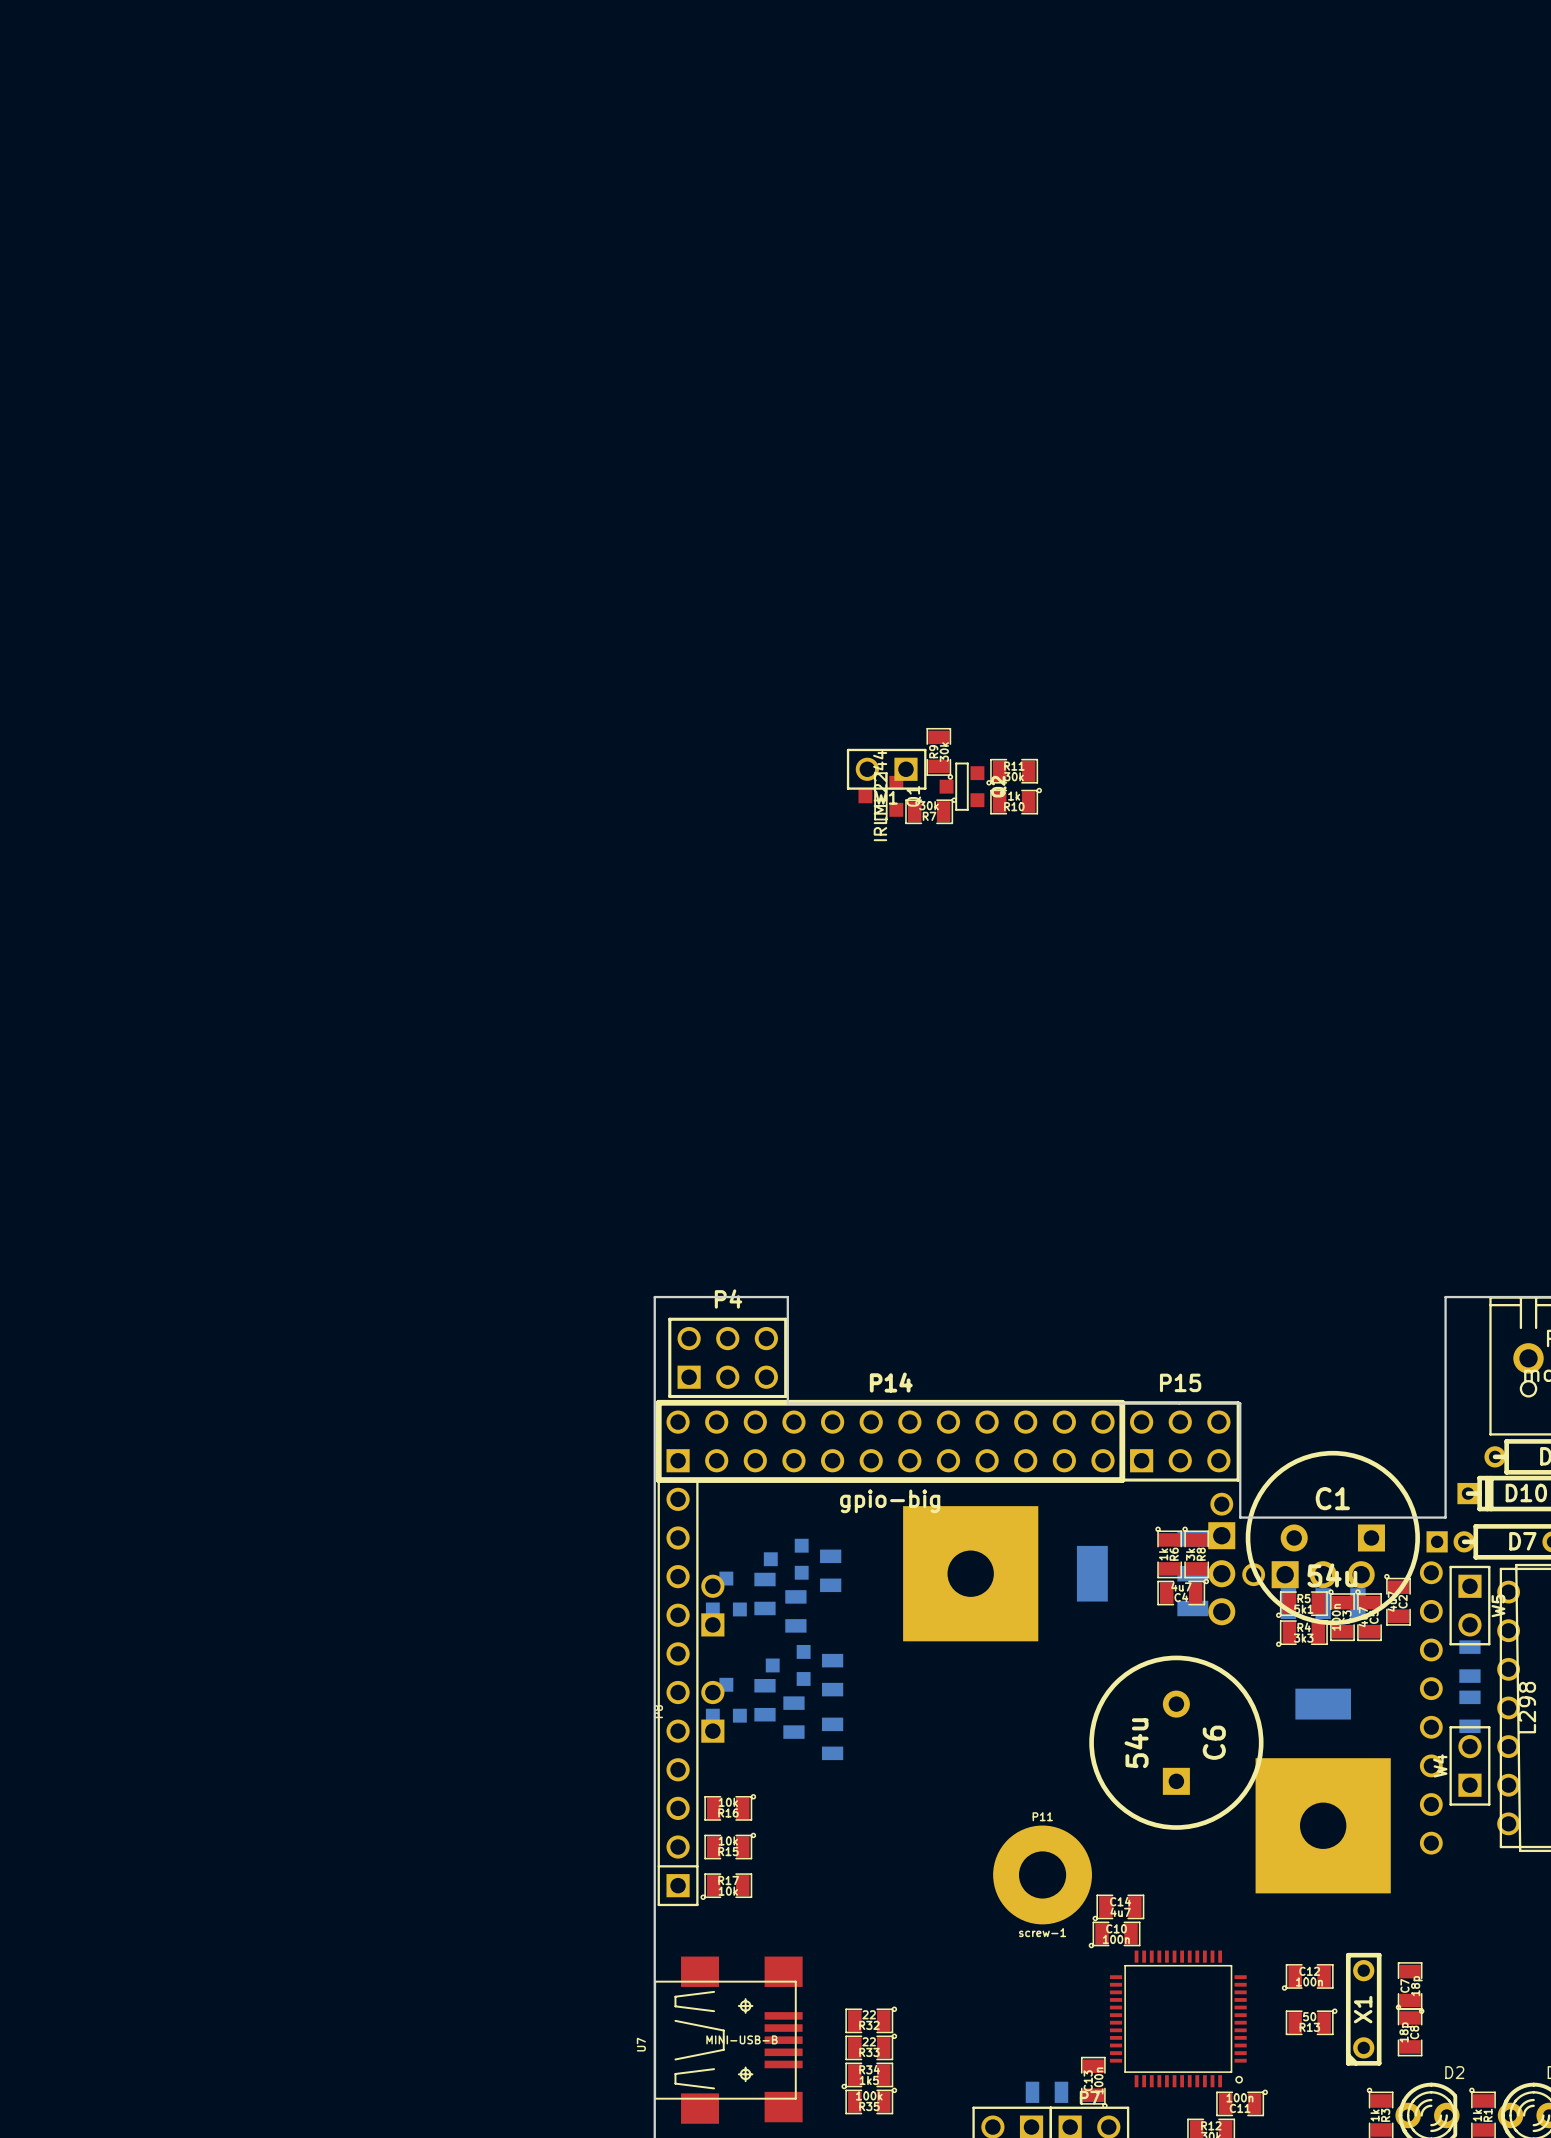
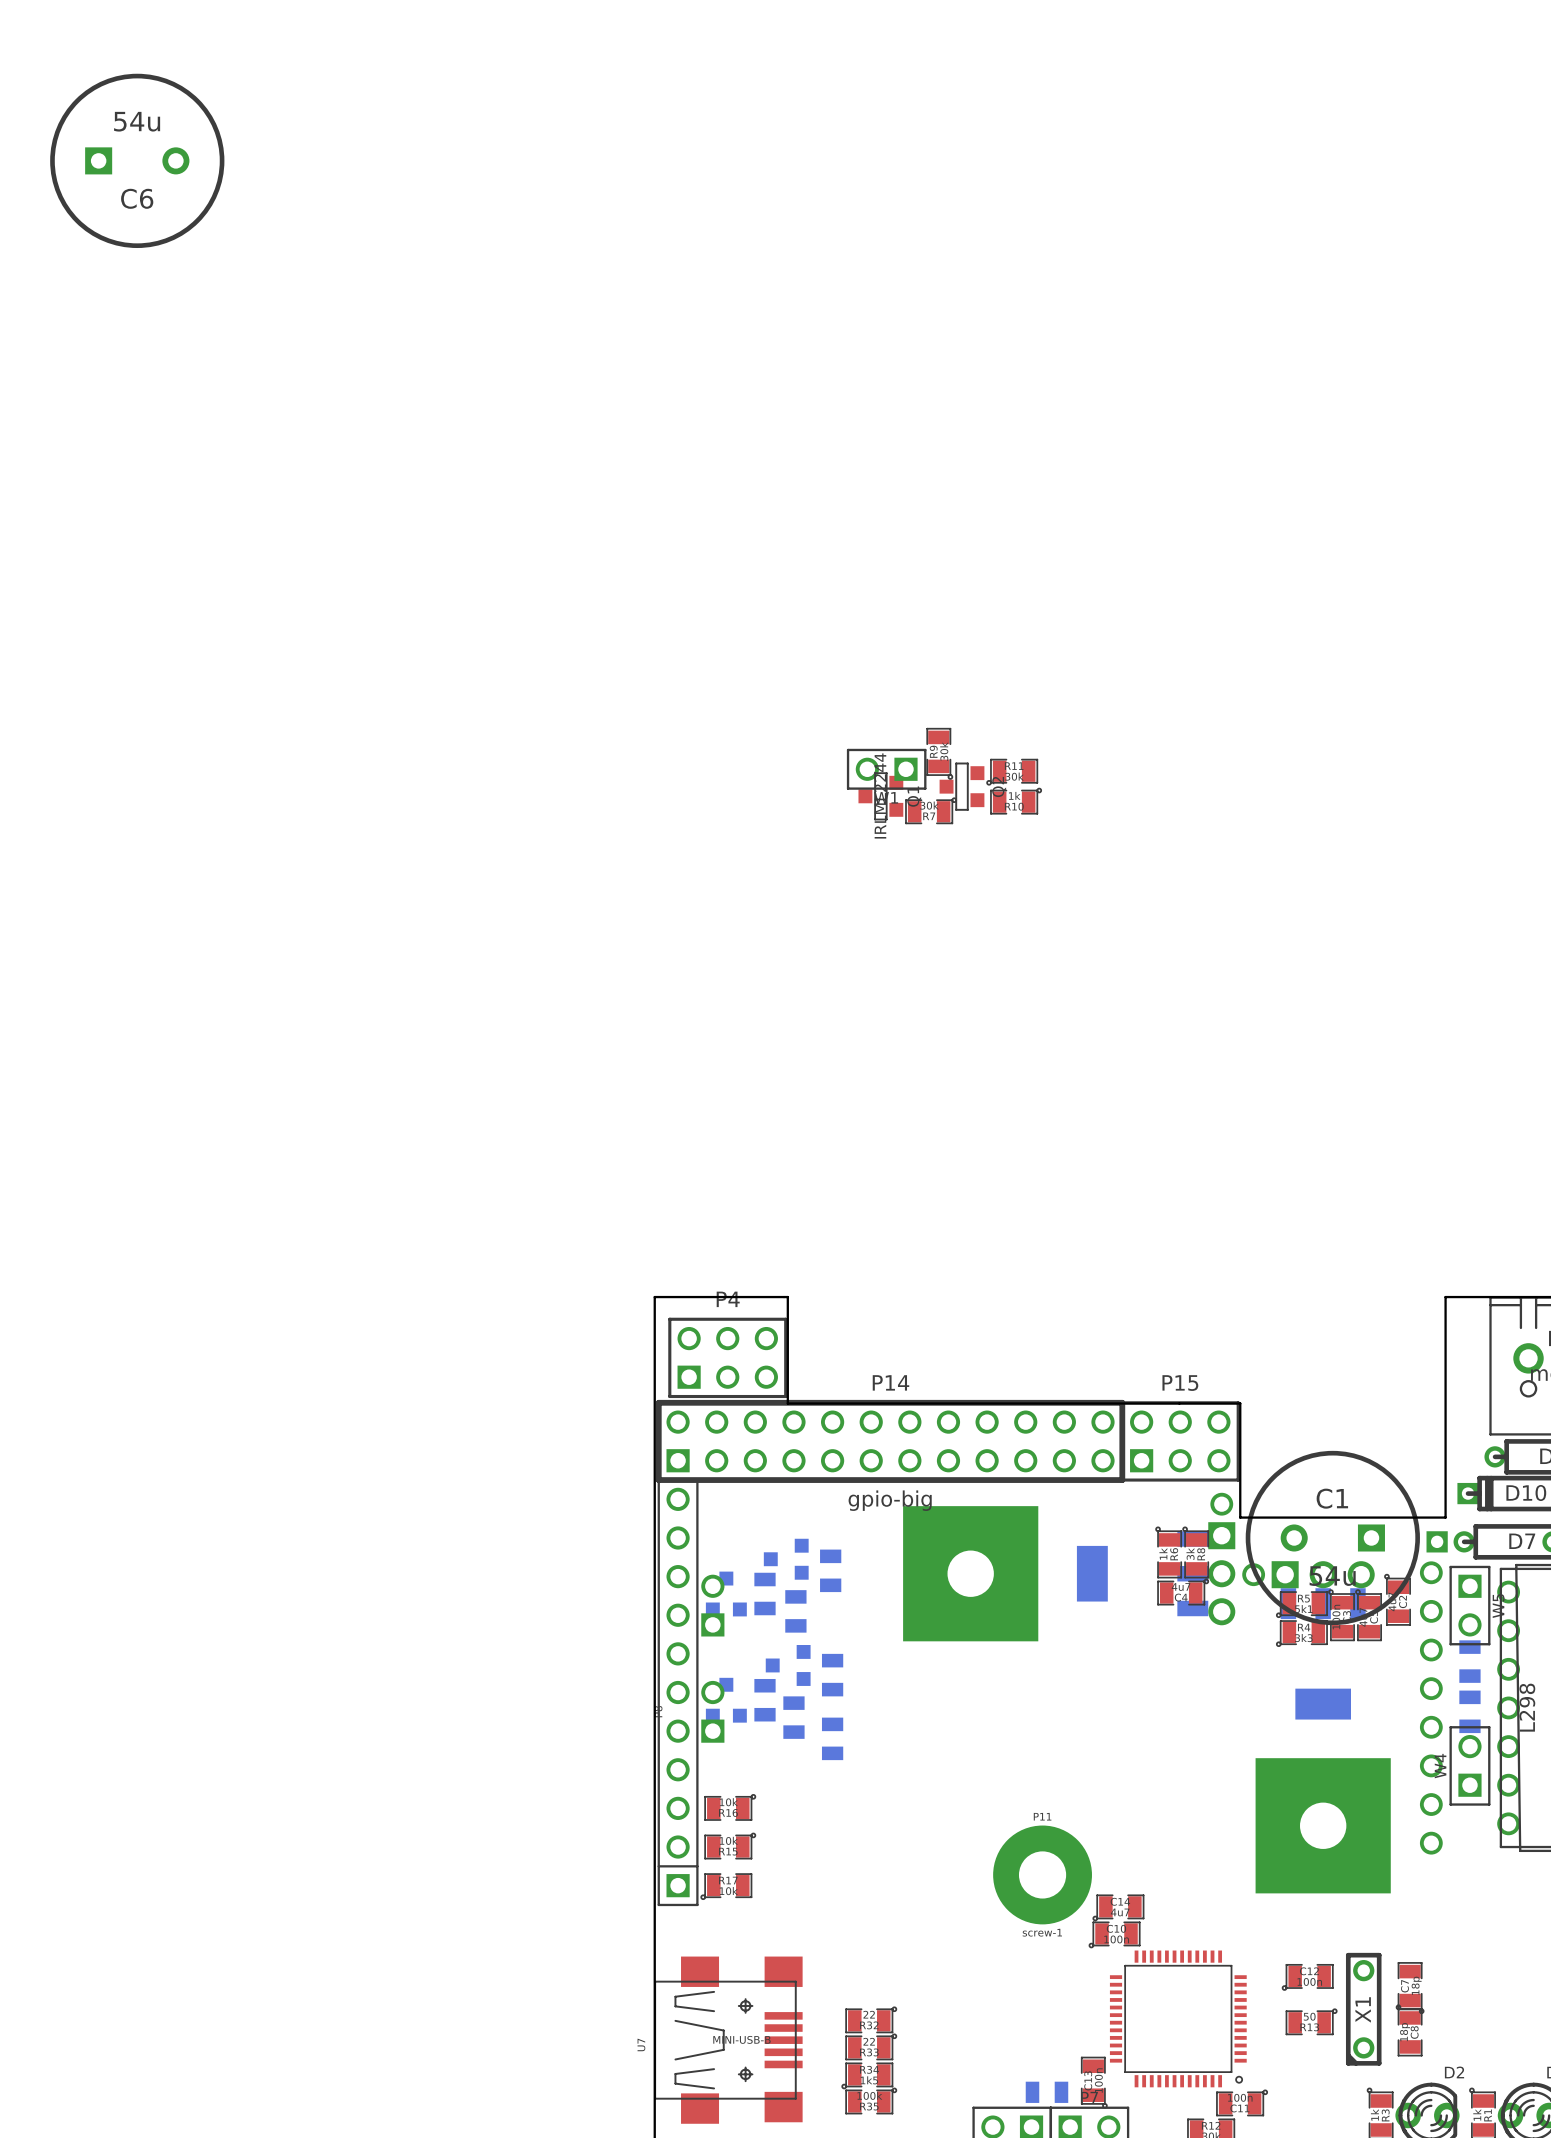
C6 rotation: 0° (1176, 1742) -> 90° clockwise (137, 160)
C6 position: (1176, 1742) -> (137, 160)

